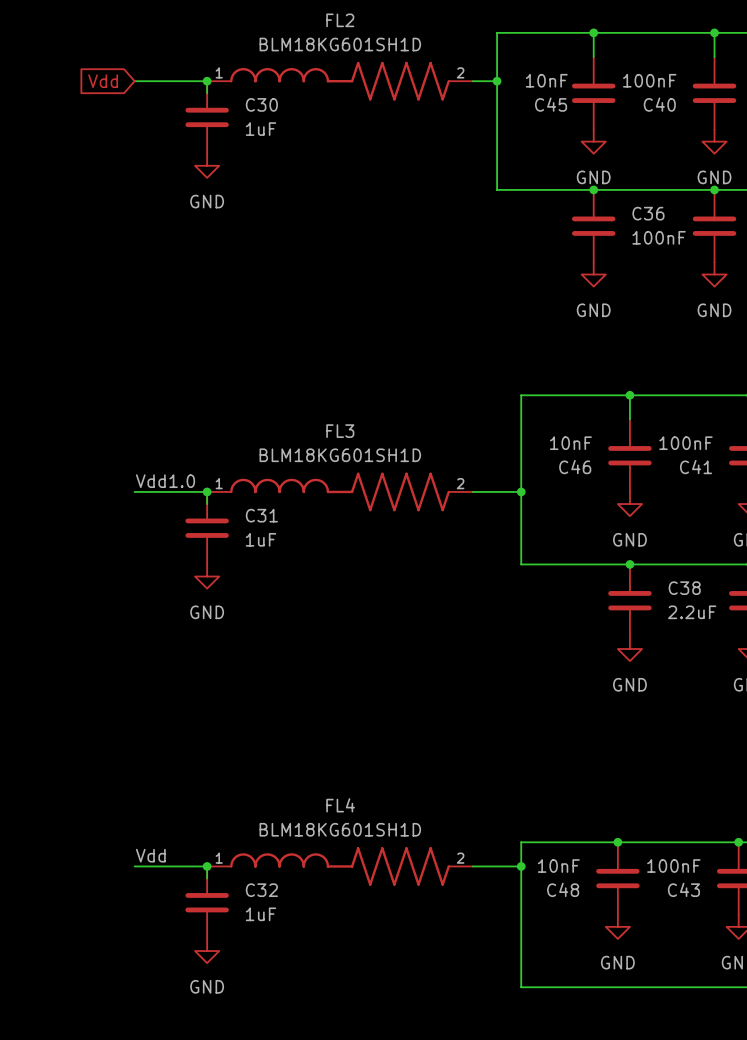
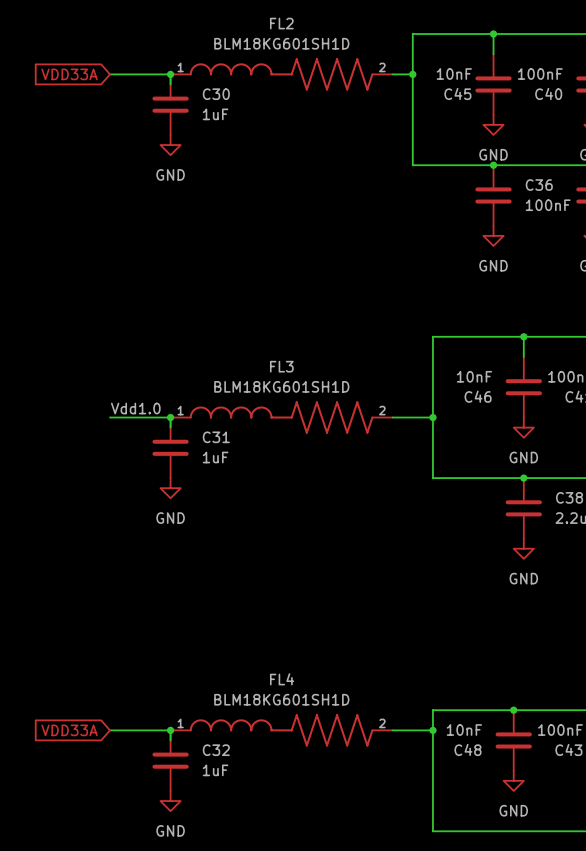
global label: Vdd (103, 81) -> VDD33A (69, 74)
label: Vdd (150, 855) -> none
global label: none -> VDD33A (69, 730)

